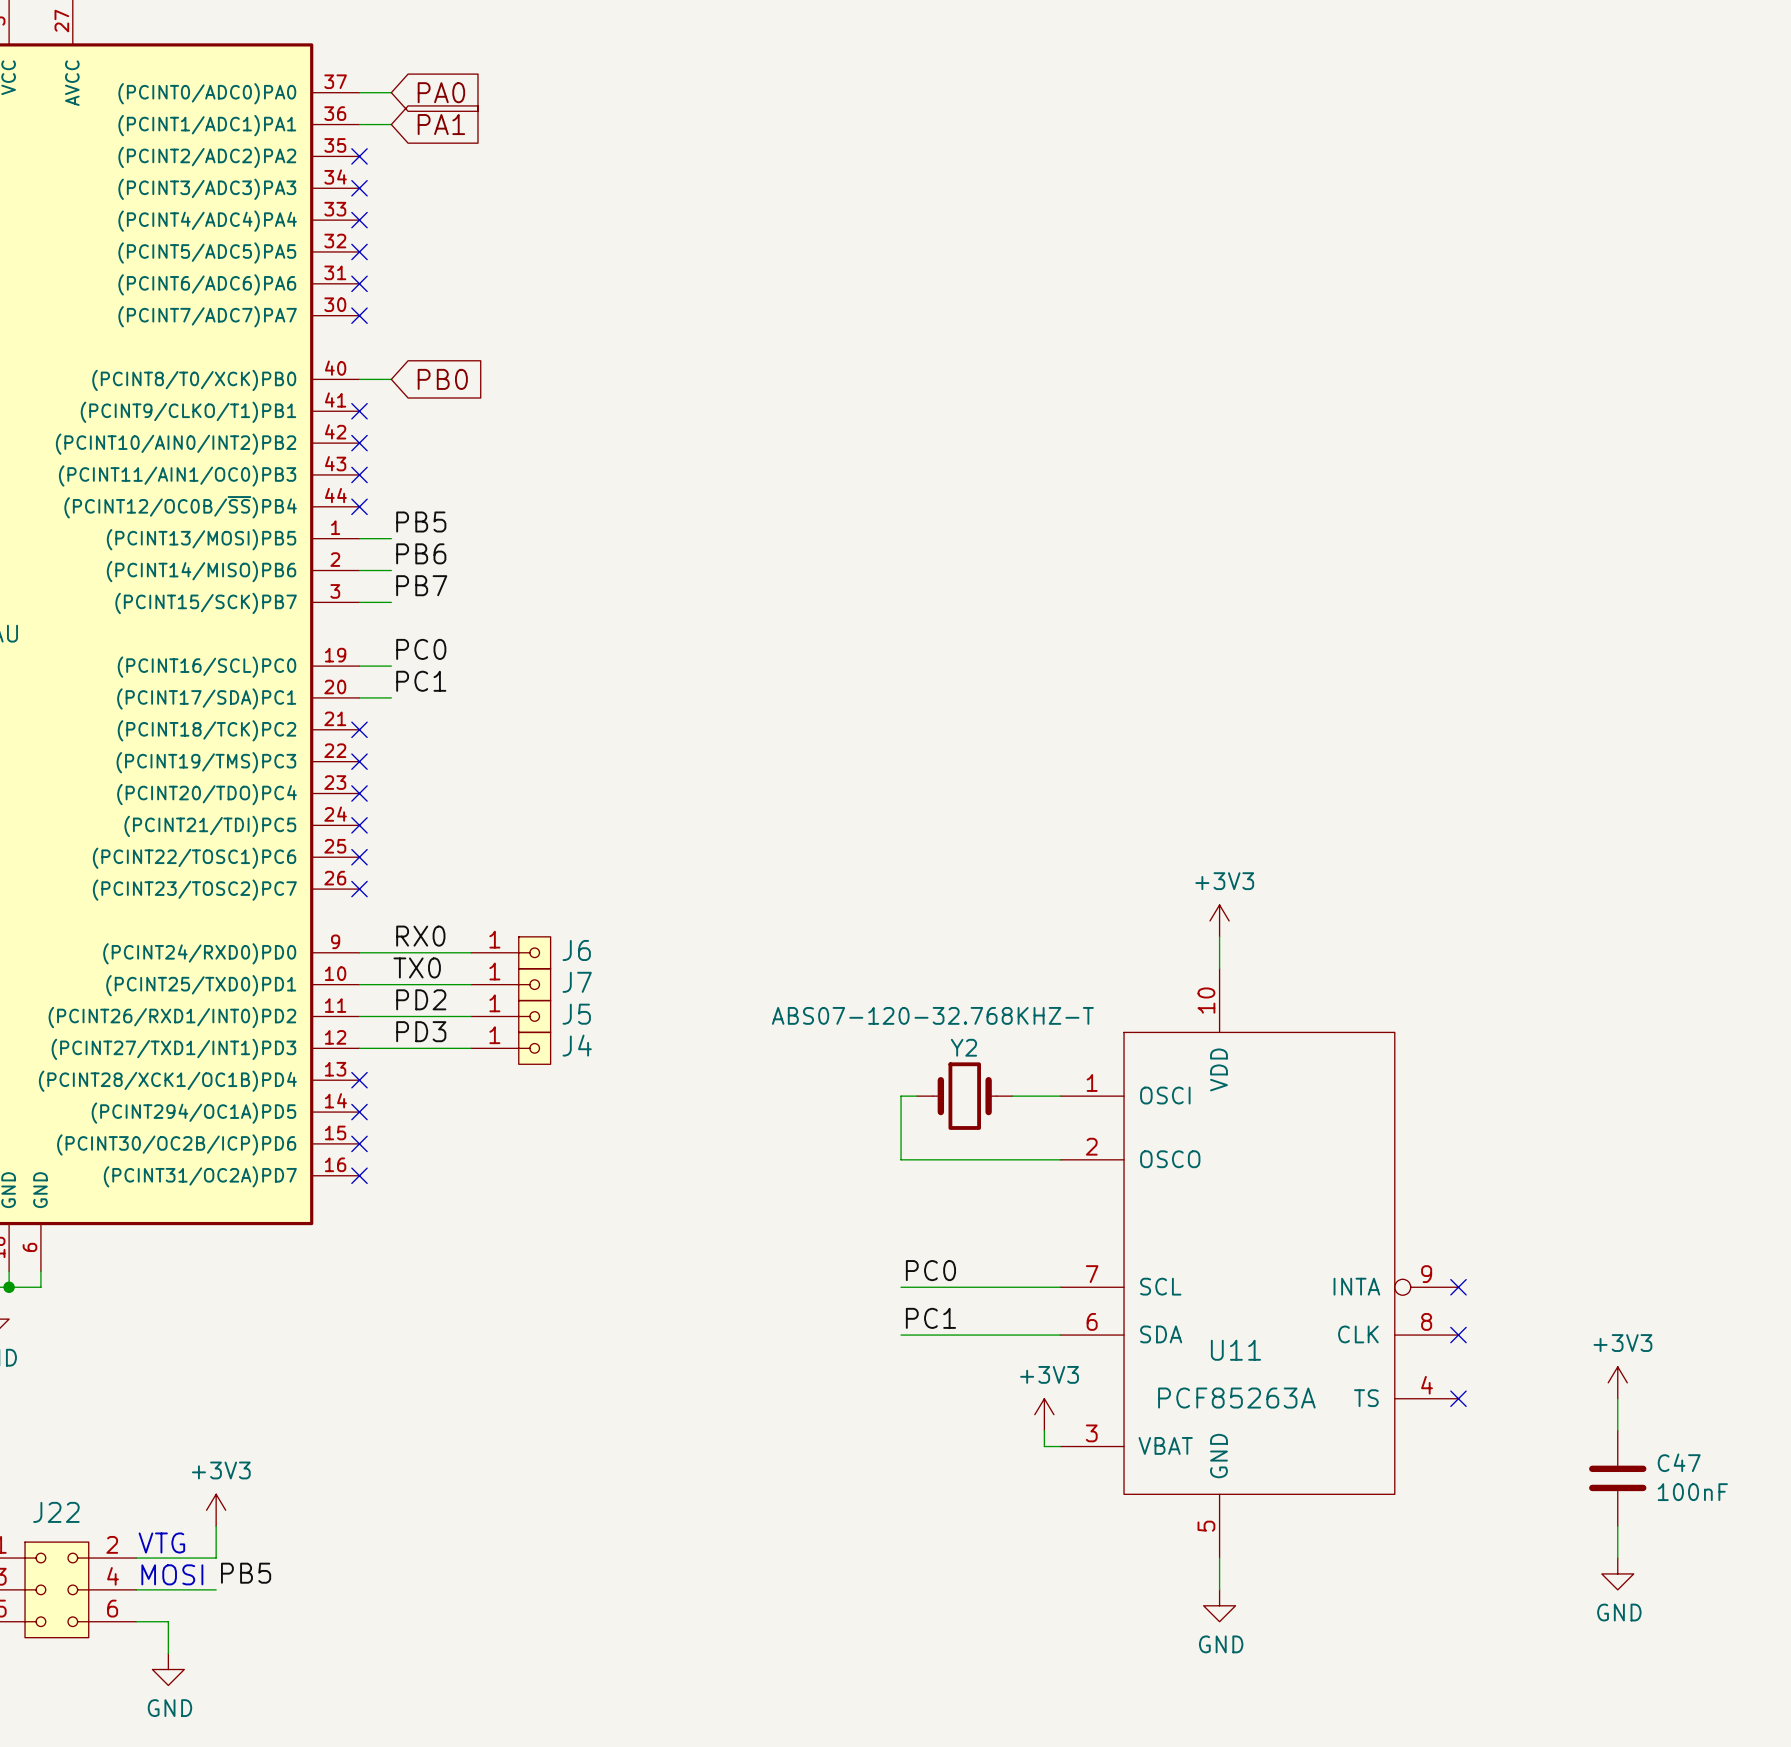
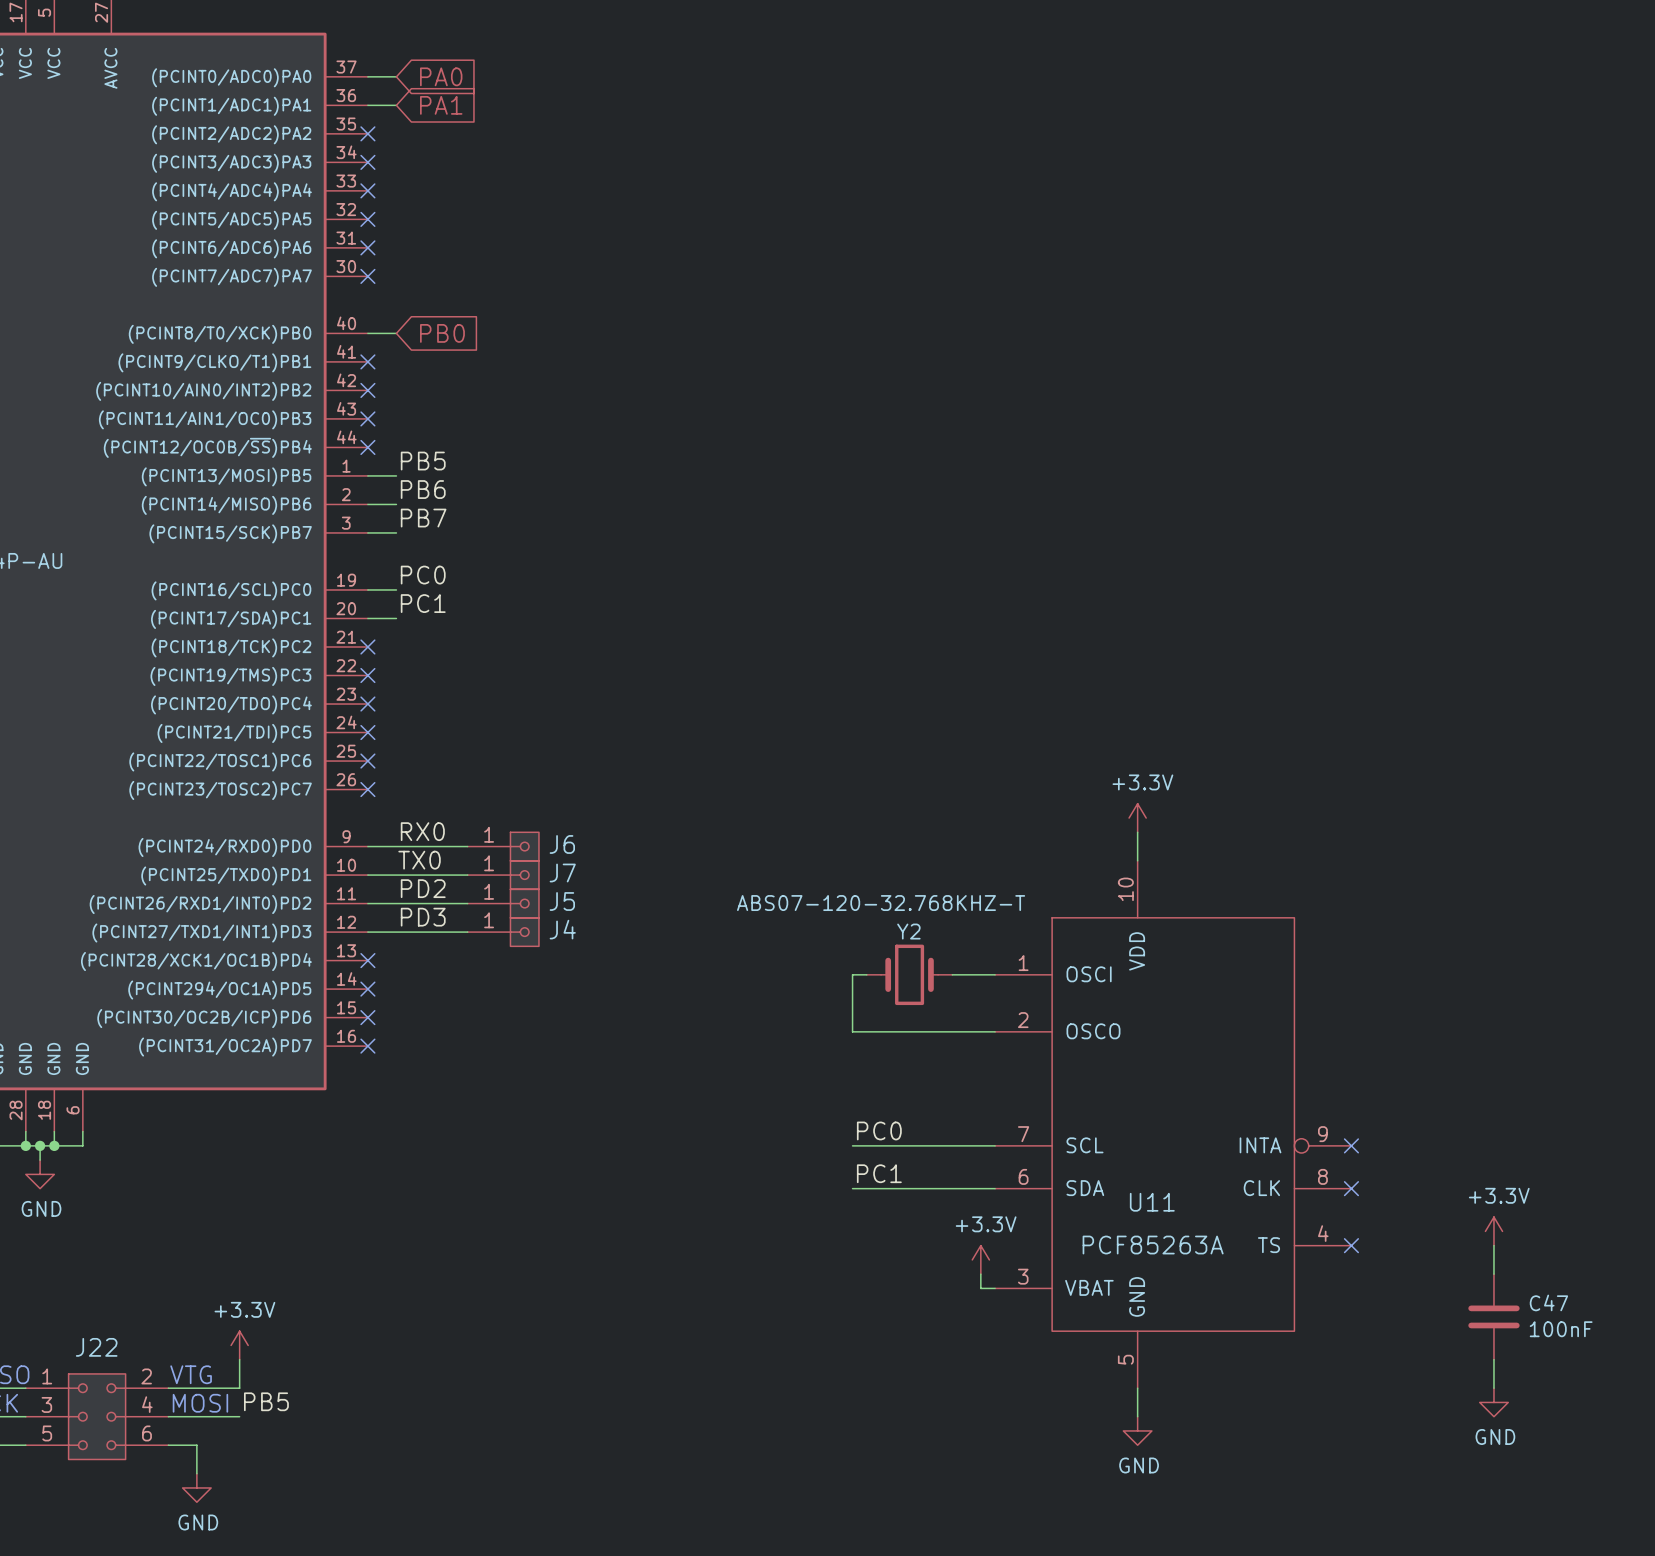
power symbol: +3V3 (1219, 920) -> +3.3V (1137, 818)
power symbol: +3V3 (1617, 1382) -> +3.3V (1493, 1231)
power symbol: +3V3 (1044, 1414) -> +3.3V (980, 1259)
power symbol: +3V3 (216, 1510) -> +3.3V (239, 1345)

